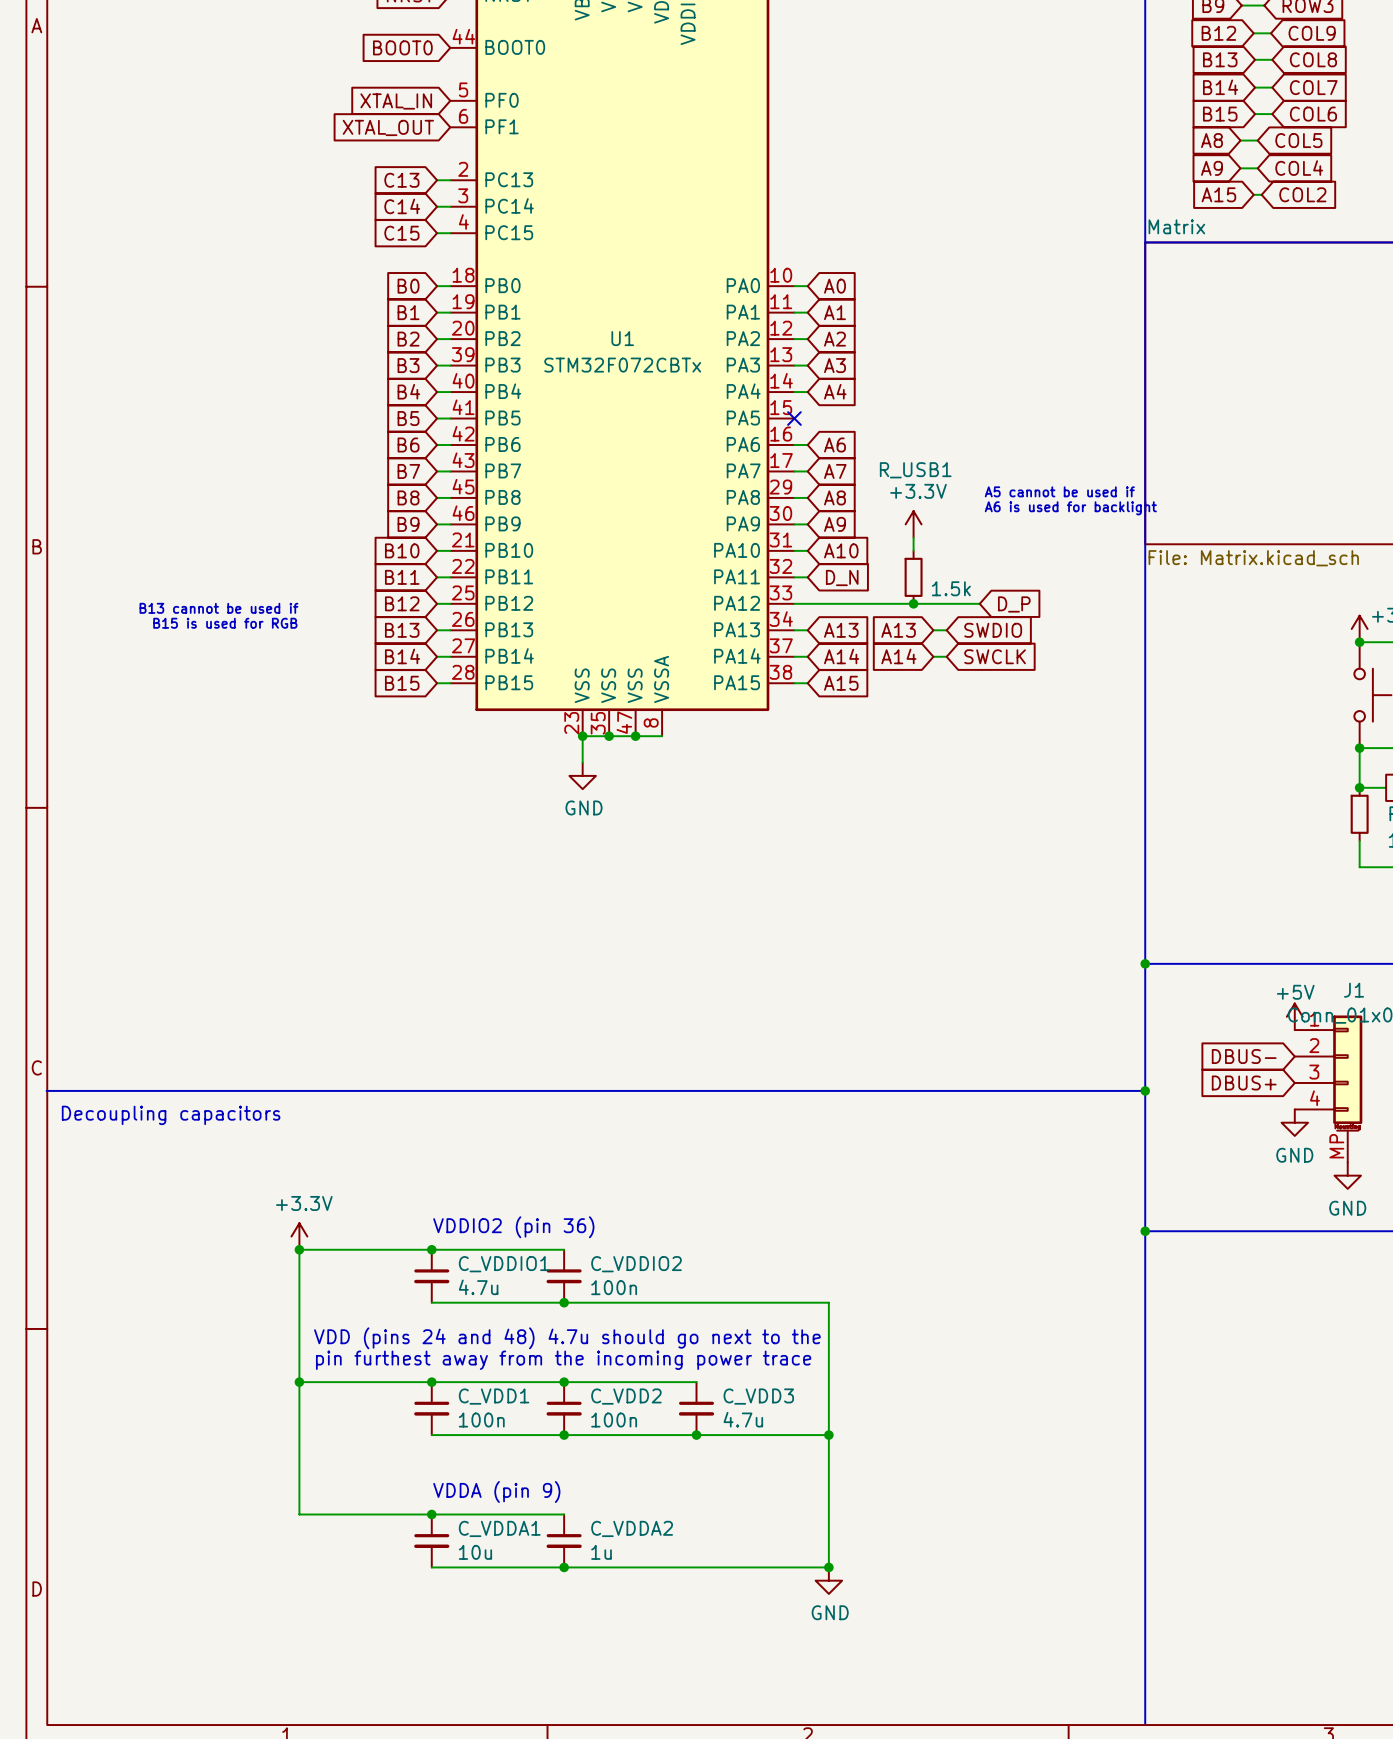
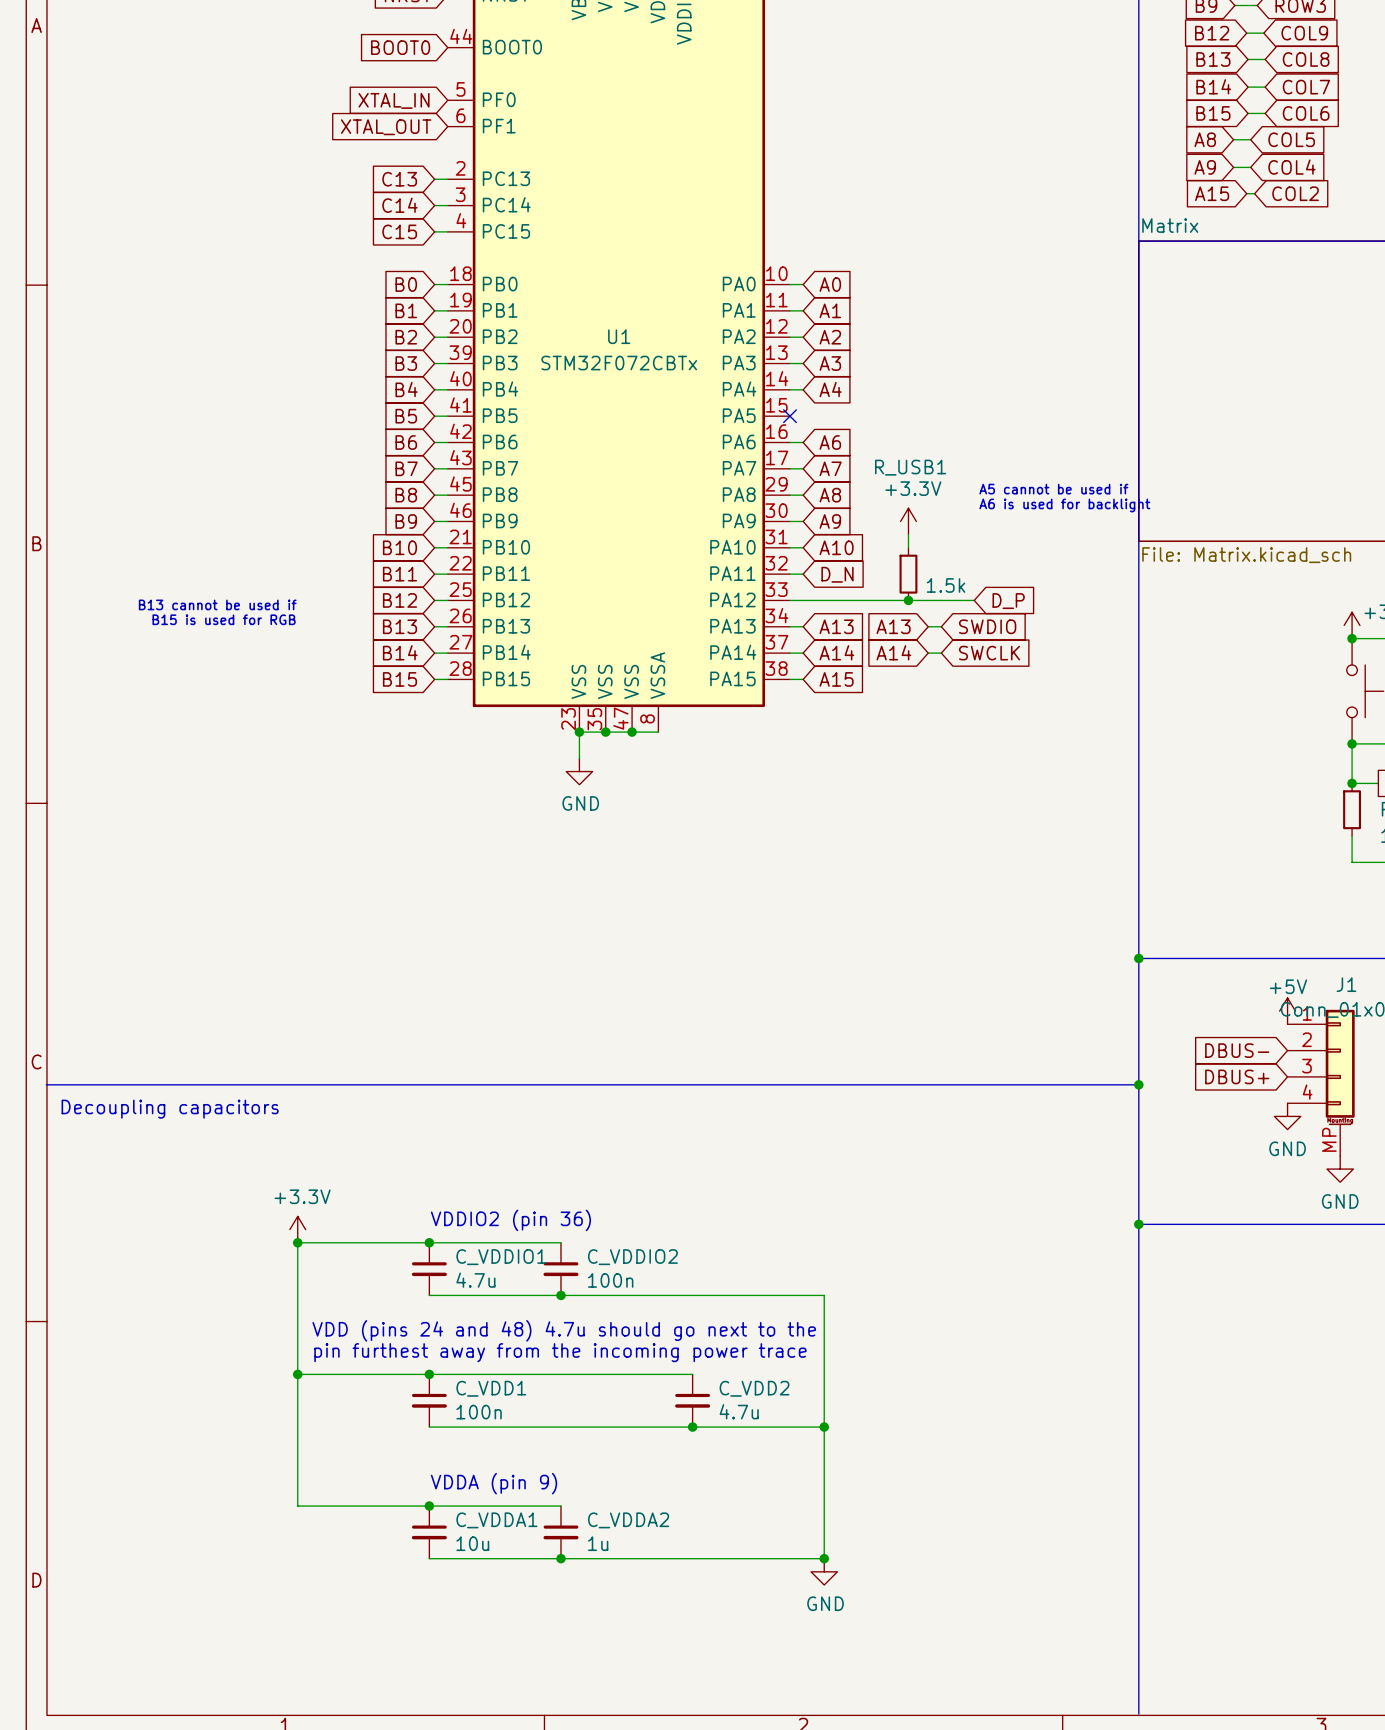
junction: (564, 1382) -> none
C_VDD3 name: C_VDD3 (758, 1396) -> C_VDD2 (754, 1388)
C_VDD2: 100n (564, 1408) -> none
junction: (564, 1435) -> none

